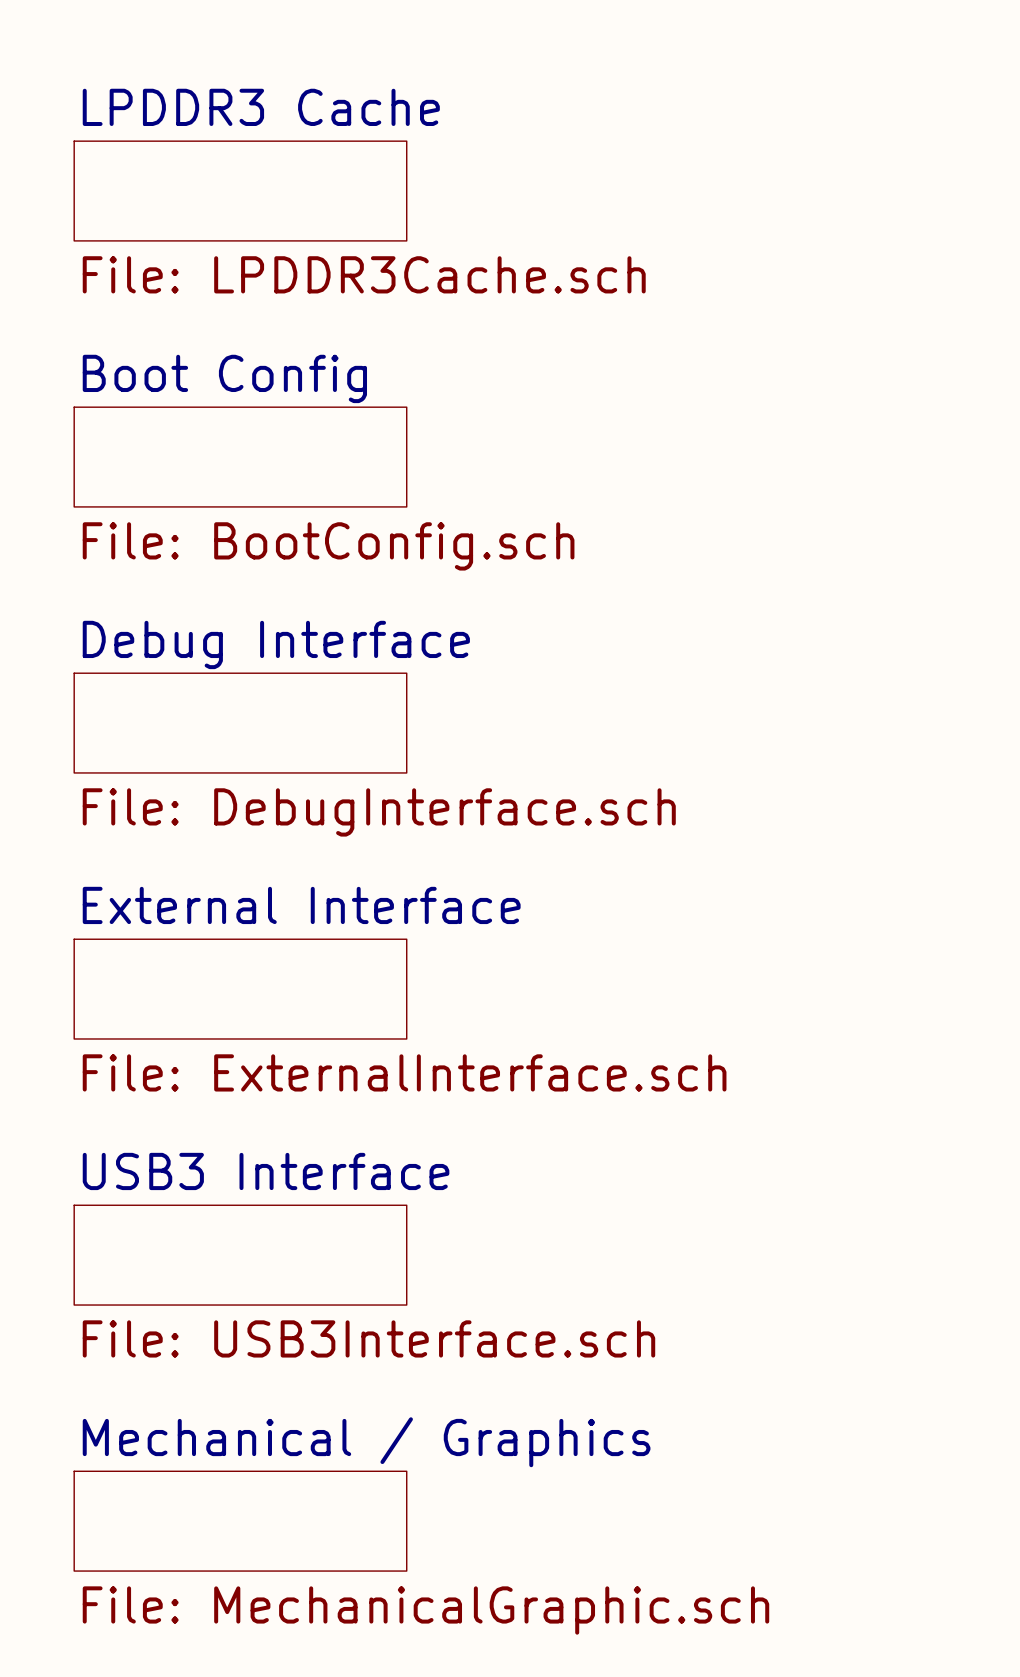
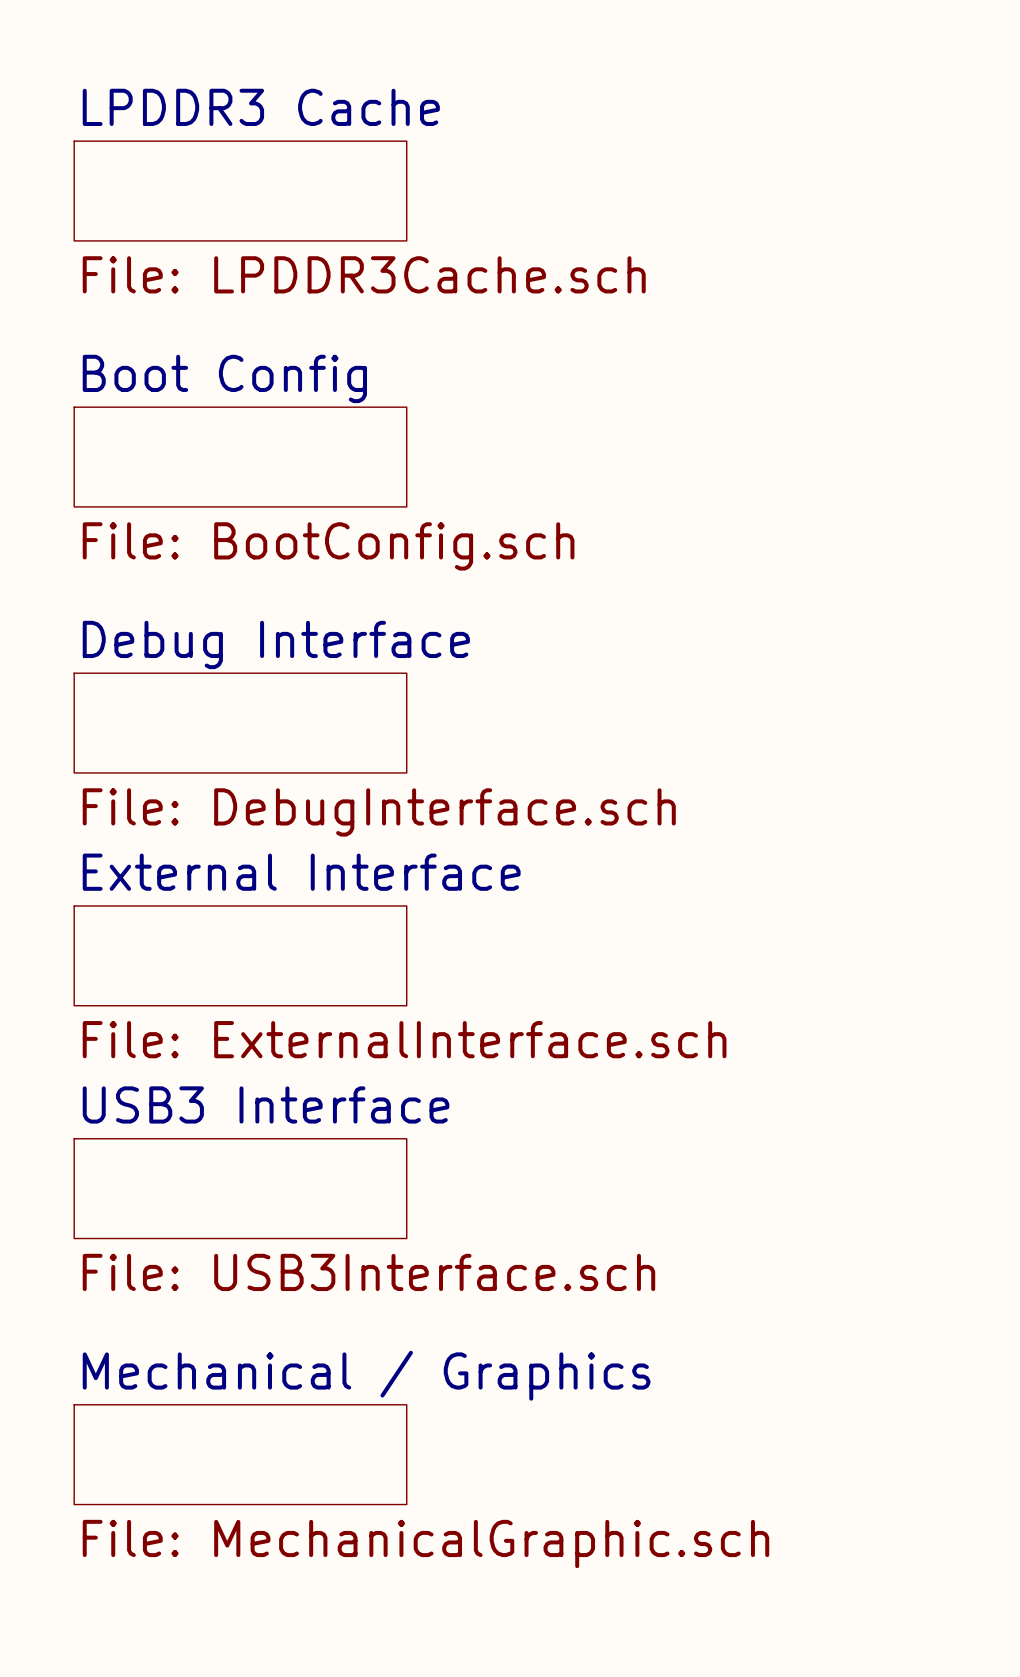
sheet External Interface position: (240, 989) -> (240, 955)
sheet USB3 Interface position: (240, 1255) -> (240, 1188)
sheet Mechanical / Graphics position: (240, 1521) -> (240, 1454)

